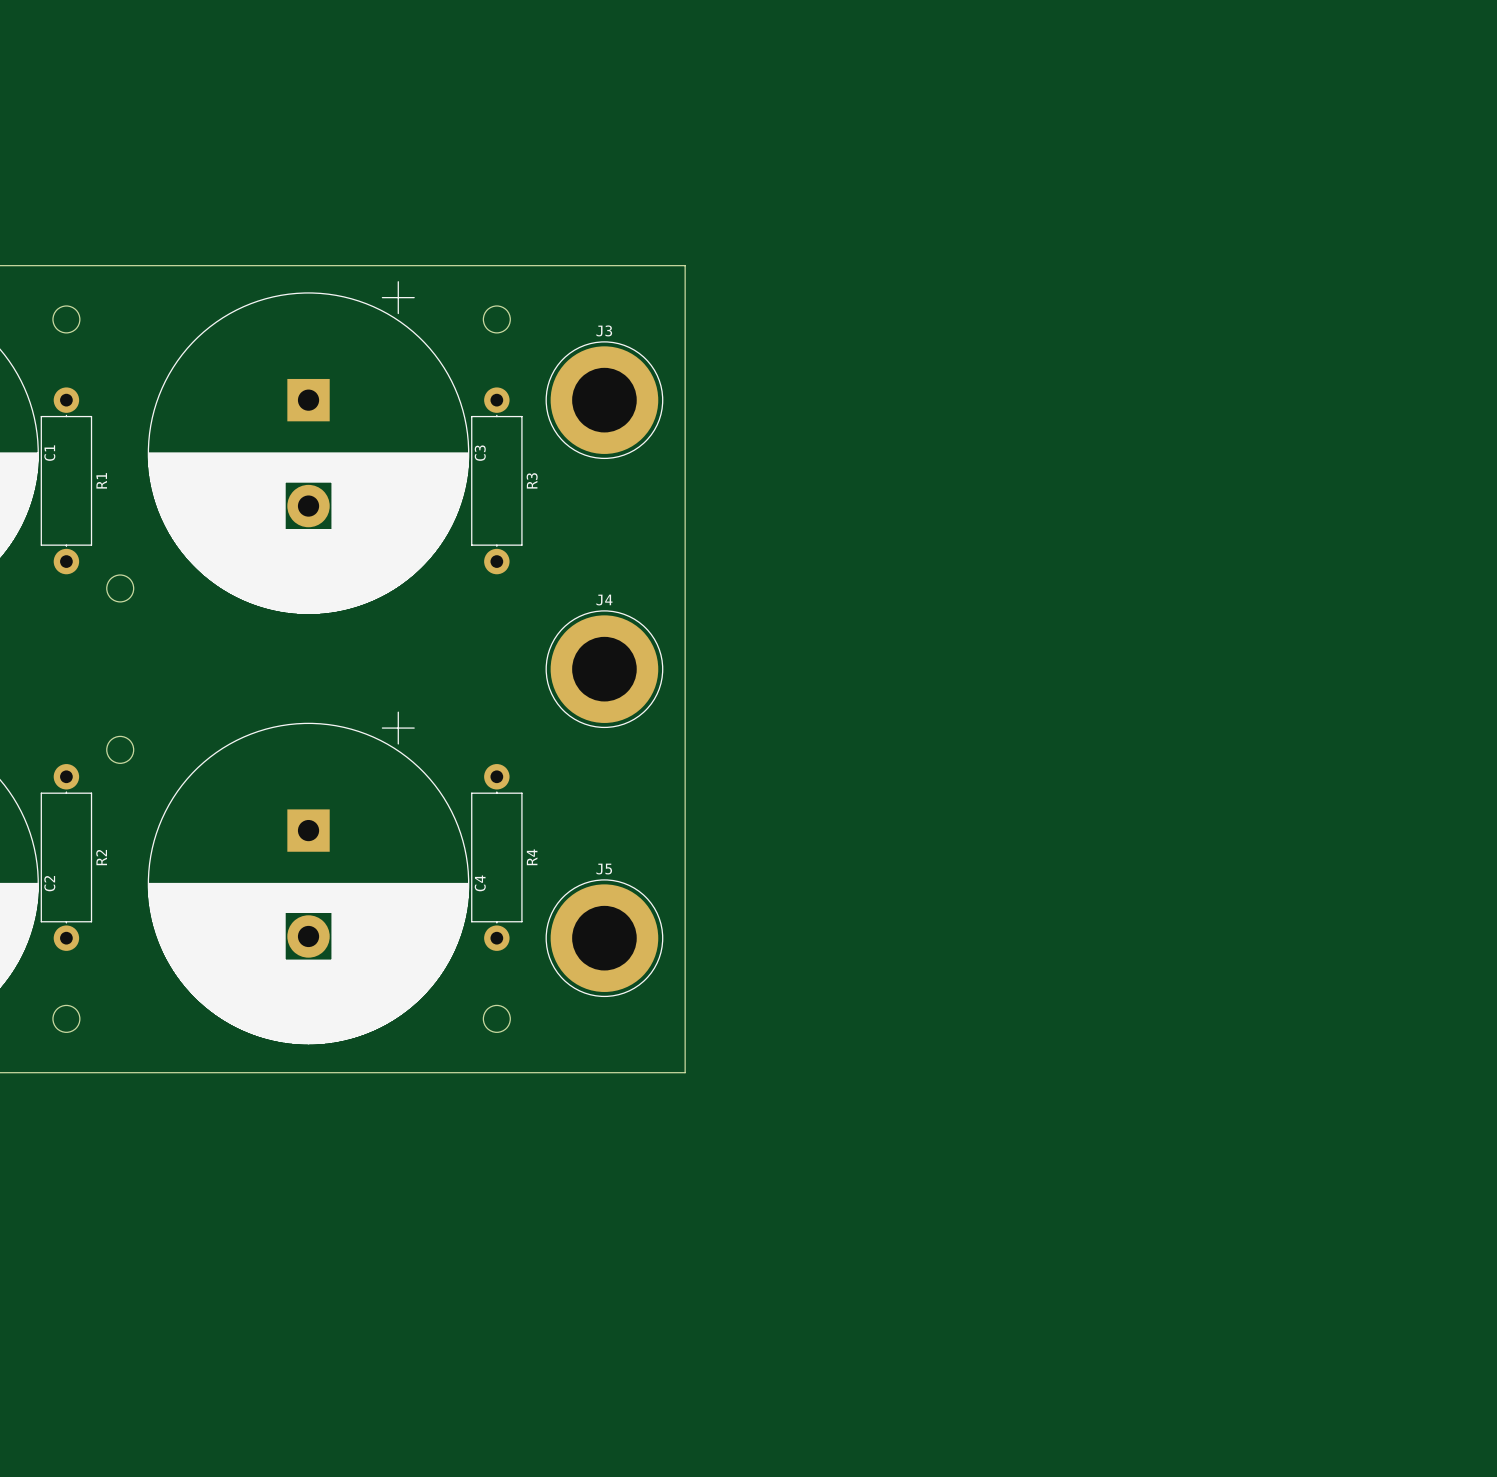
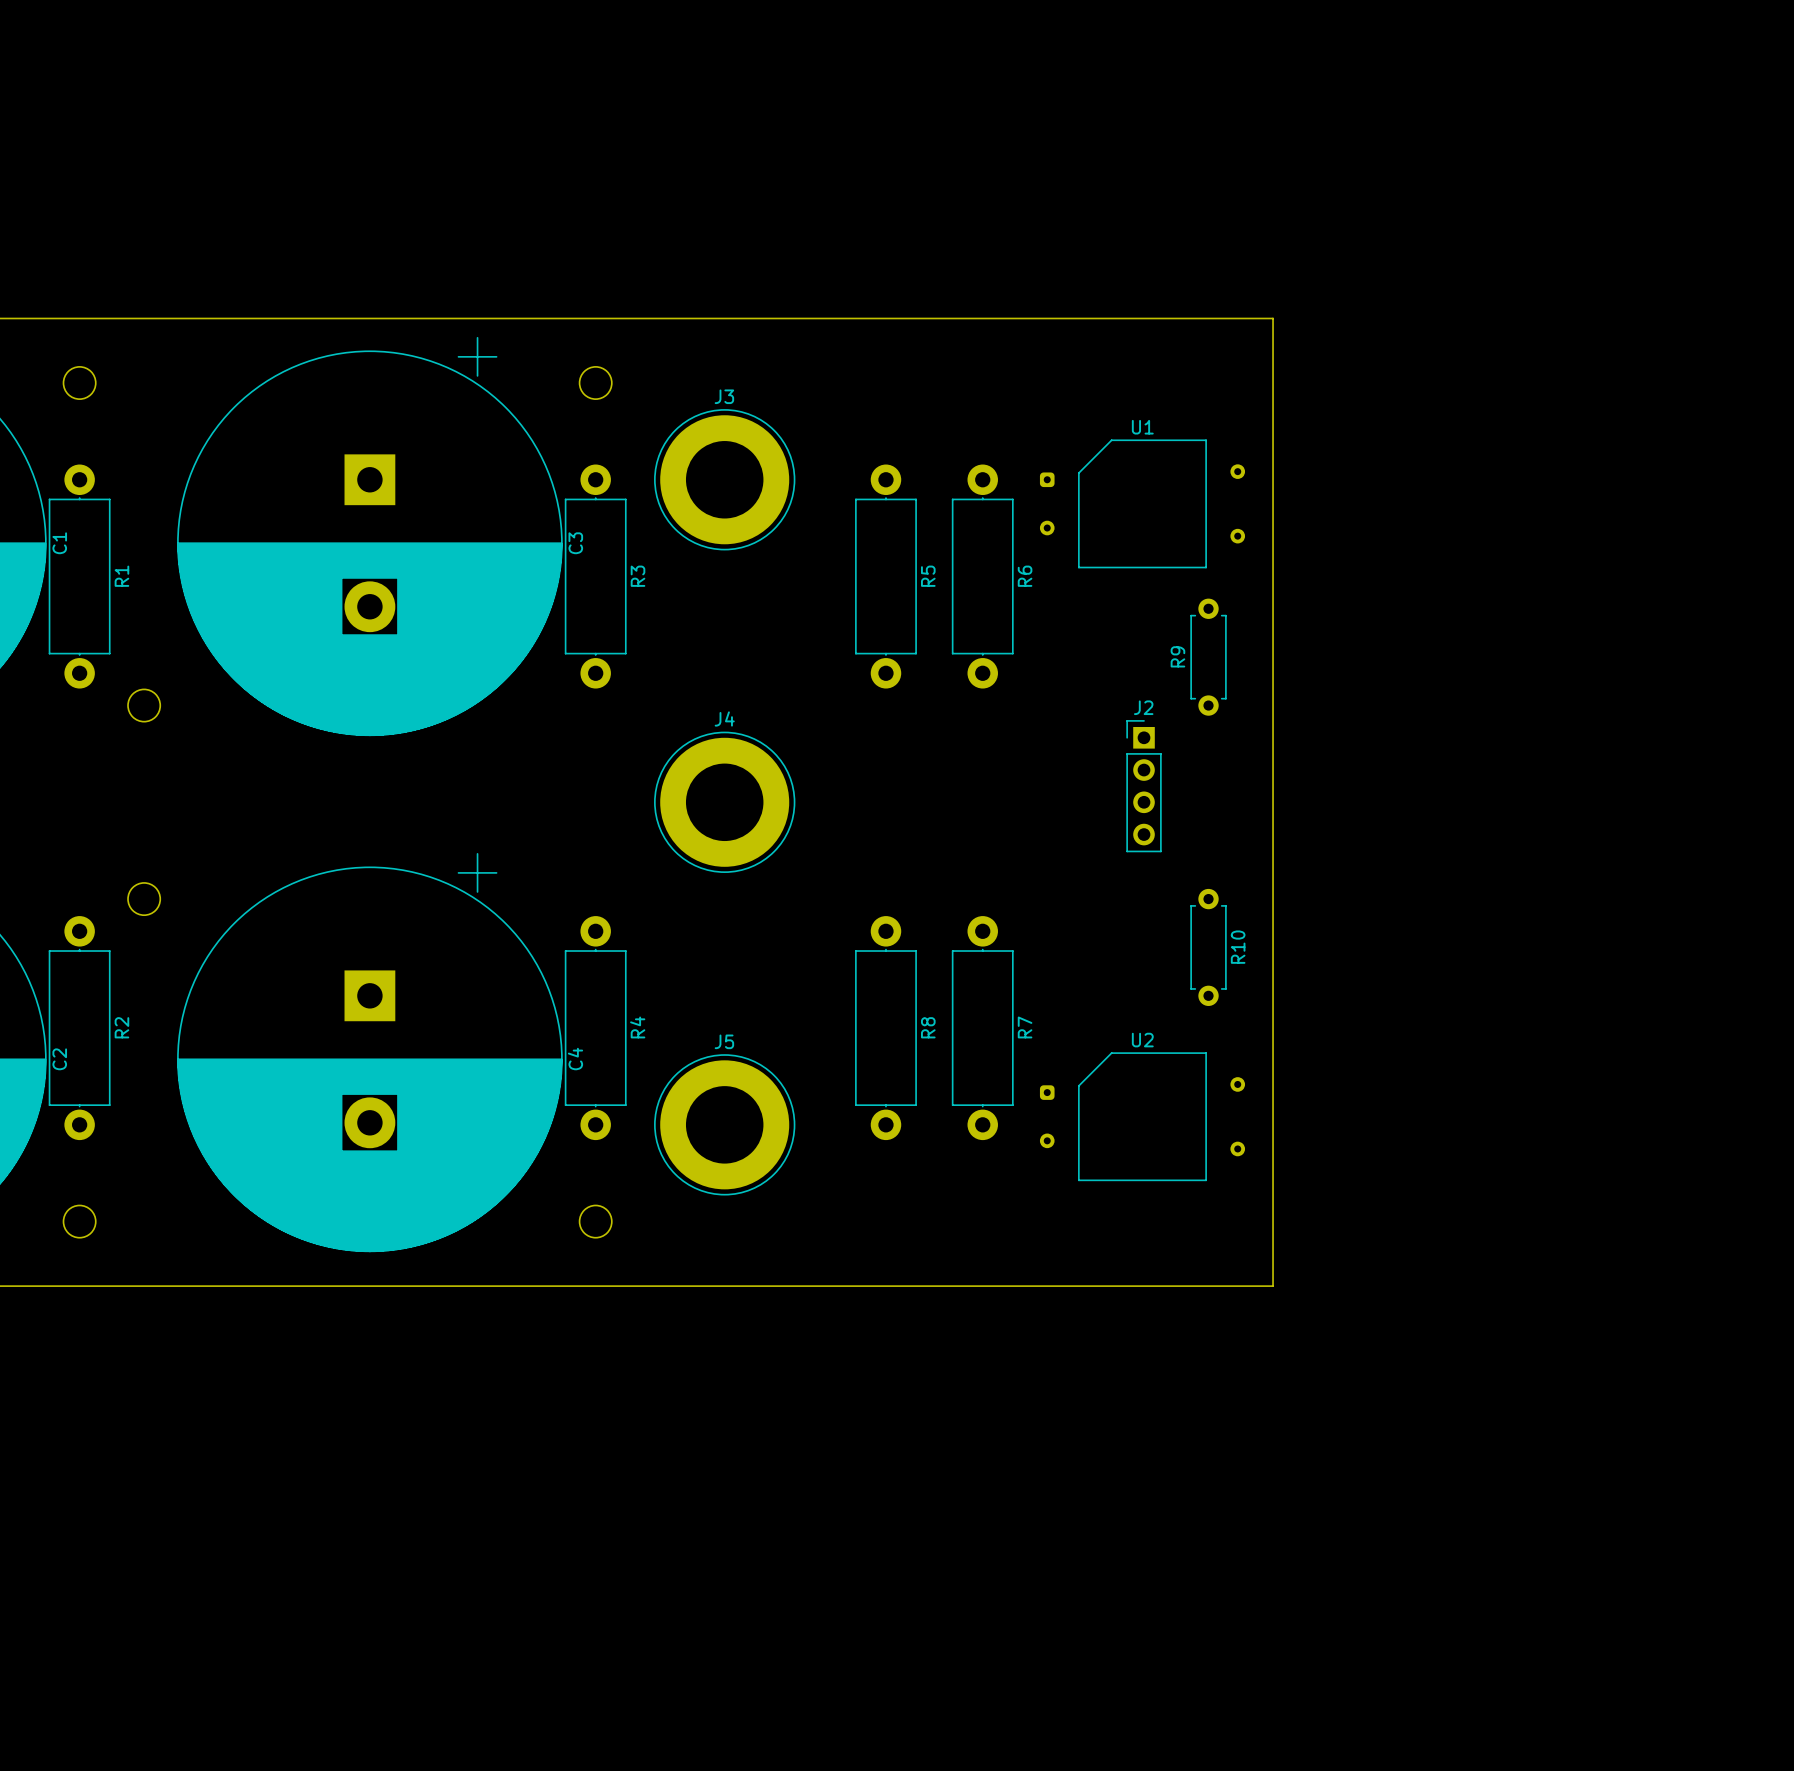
board edge: (685, 265) (685, 1072) -> (821, 318) (1273, 318) (1273, 1286) (821, 1286)
U1: none -> (1142, 503)
R5: none -> (885, 576)
R6: none -> (982, 576)
R9: none -> (1208, 657)
J2: none -> (1144, 786)
R10: none -> (1208, 947)
R8: none -> (885, 1028)
R7: none -> (982, 1028)
U2: none -> (1142, 1116)

